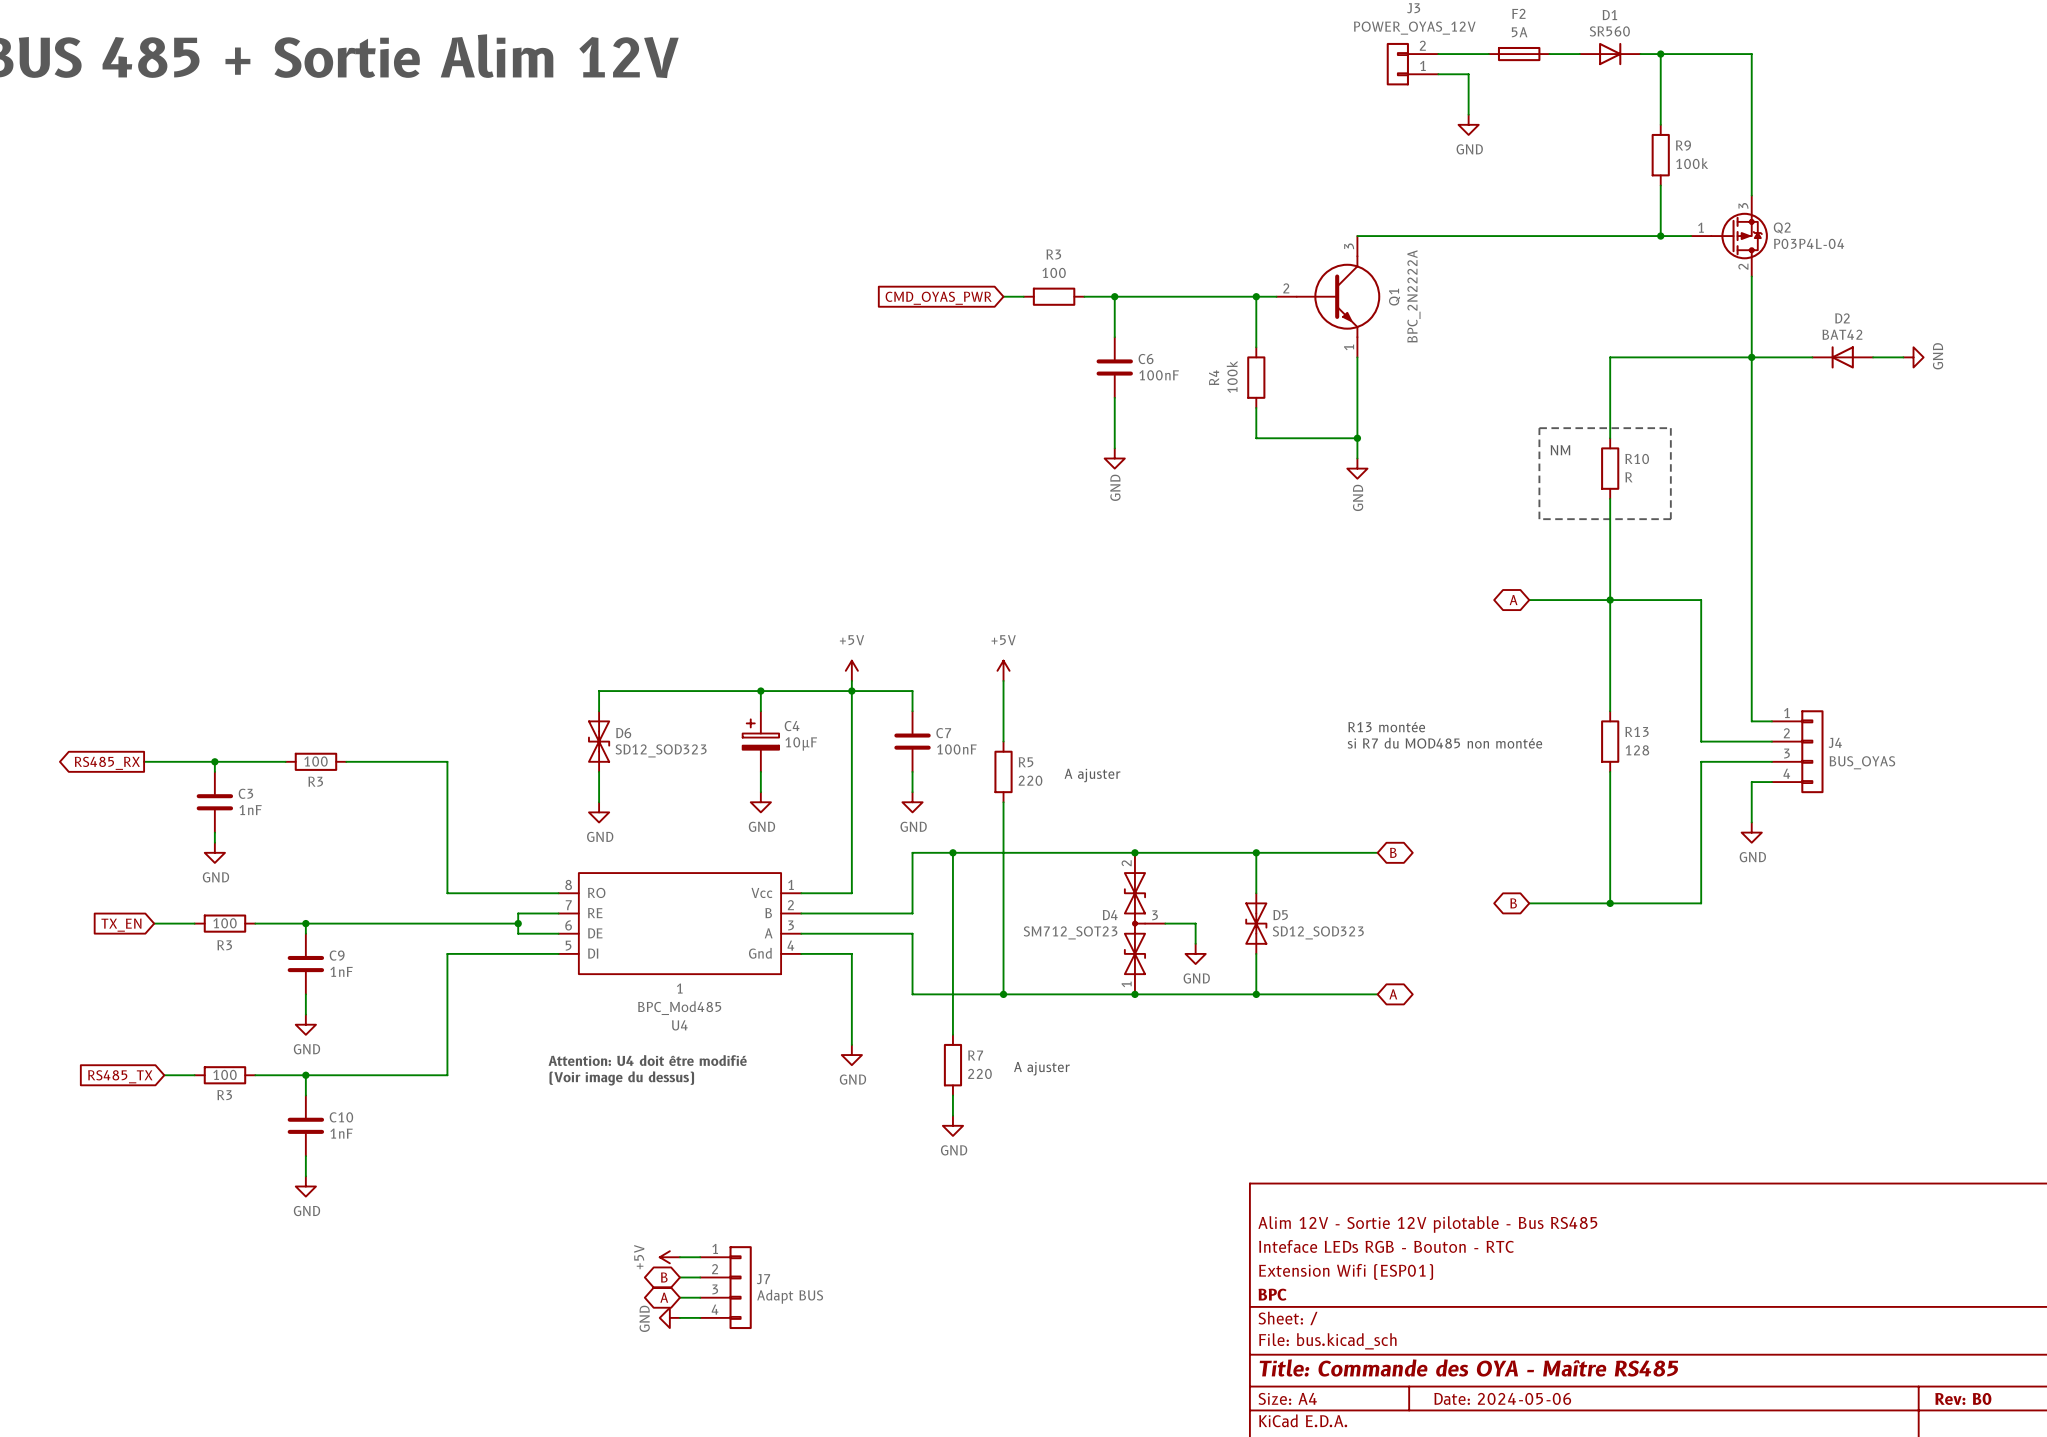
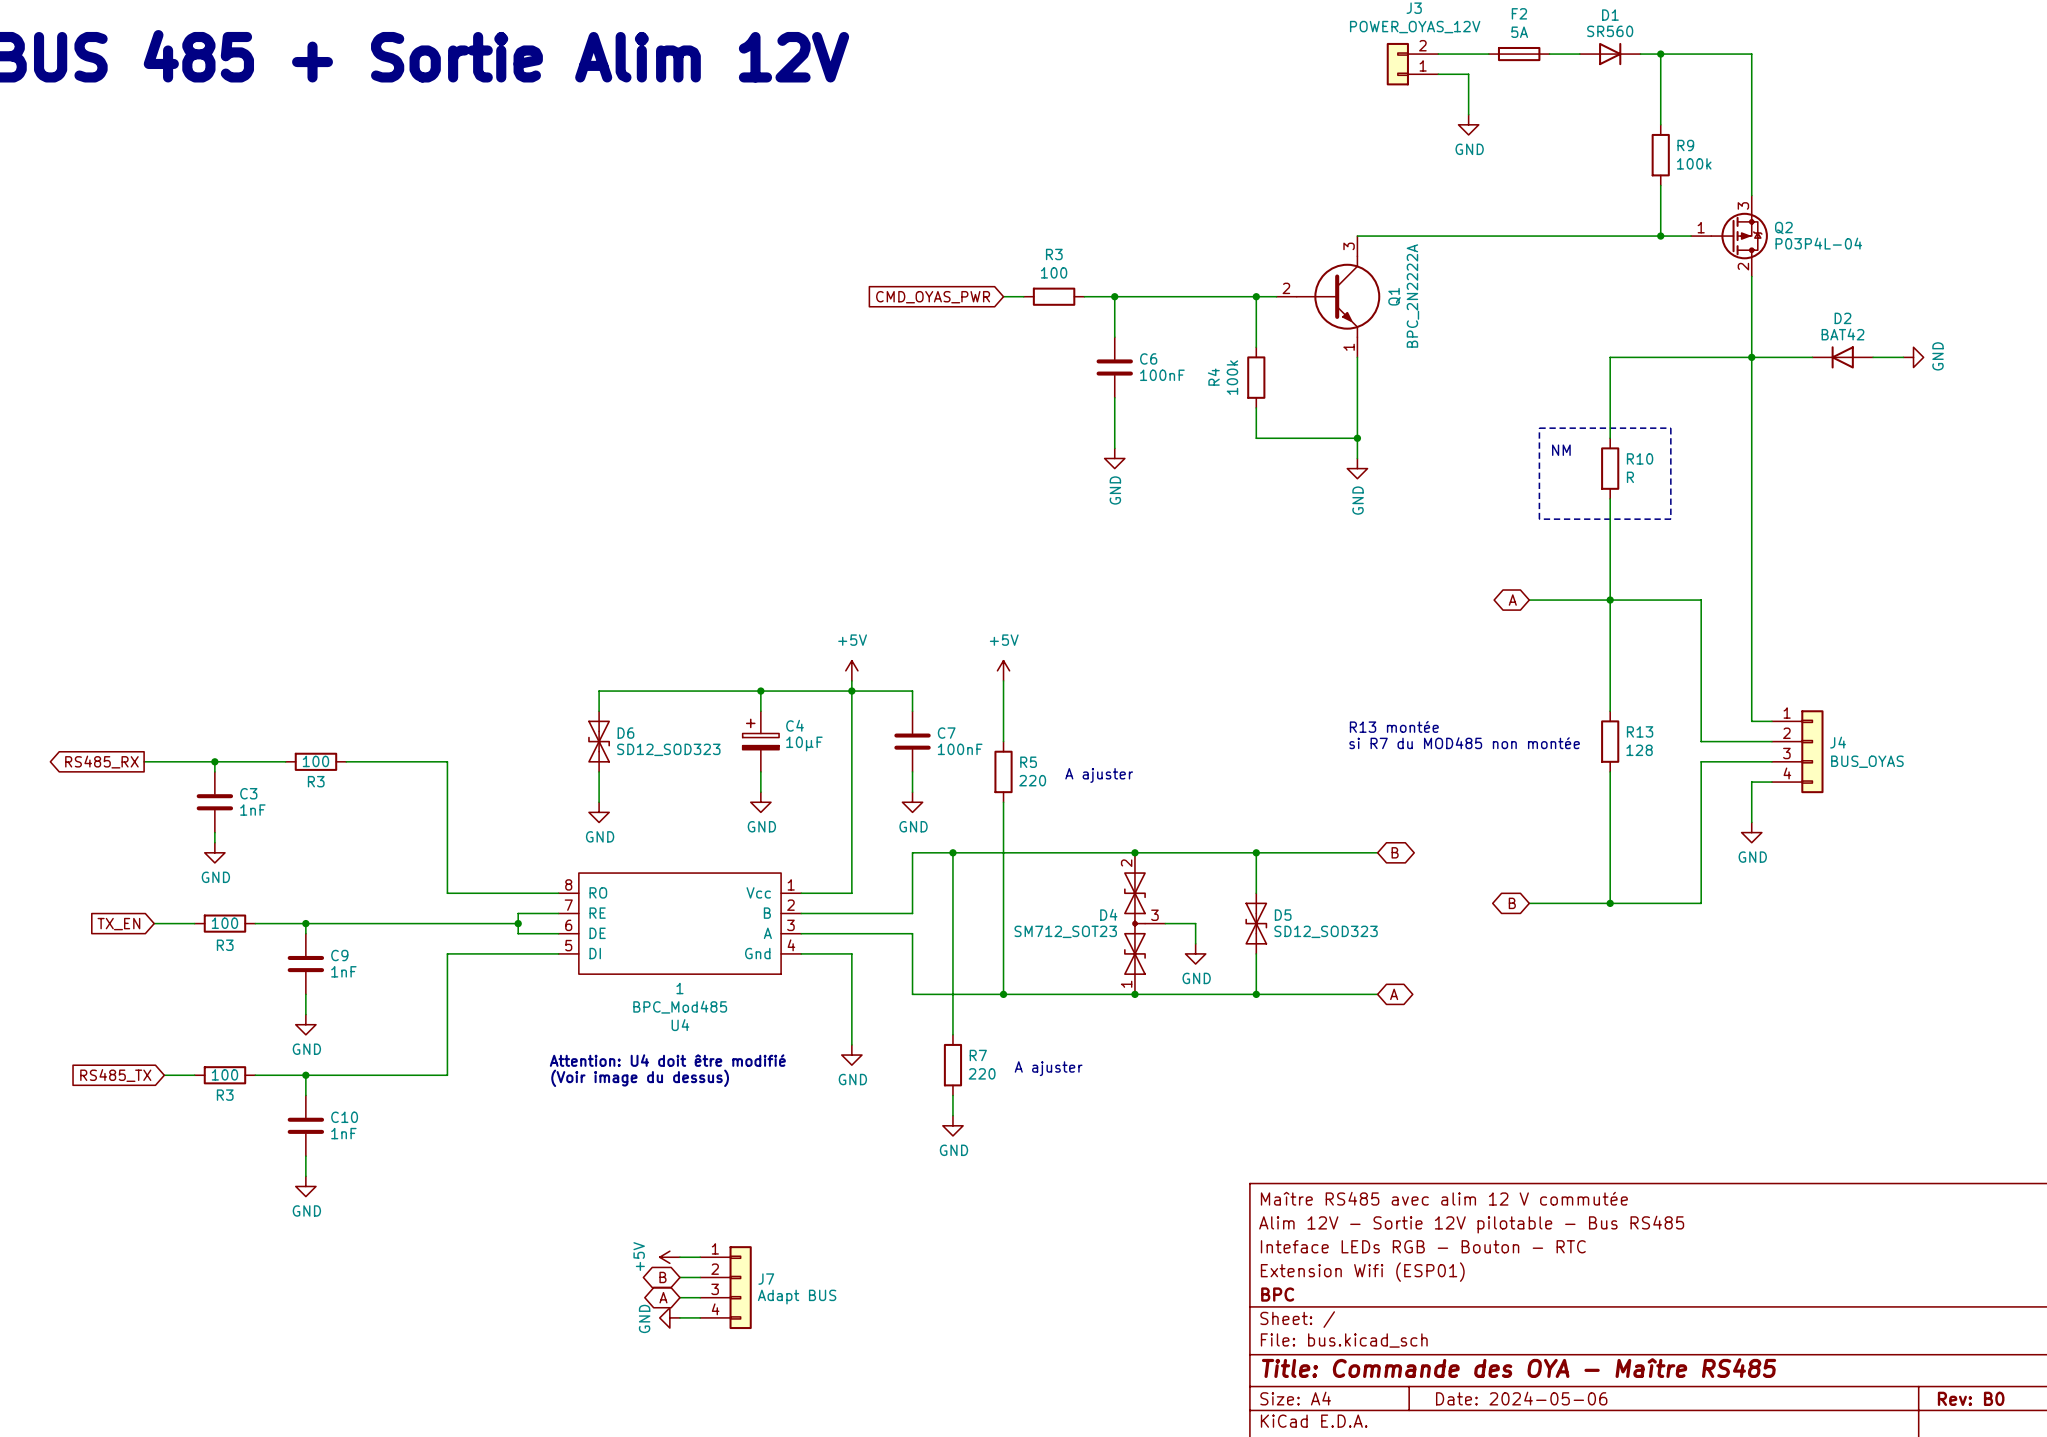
title block: none -> Maître RS485 avec alim 12 V commutée (1444, 1198)

